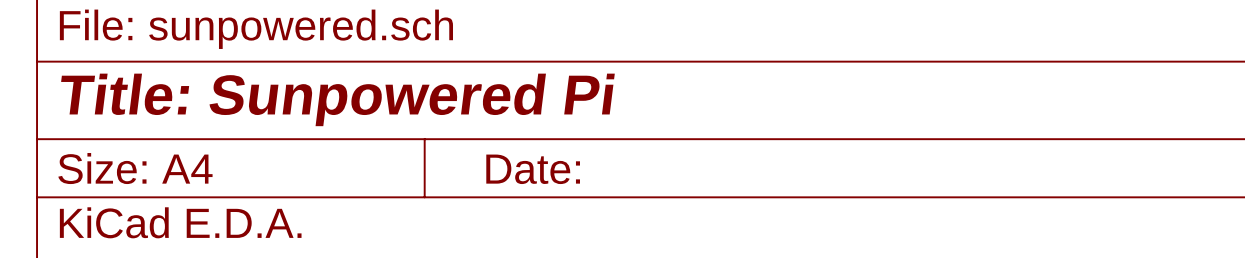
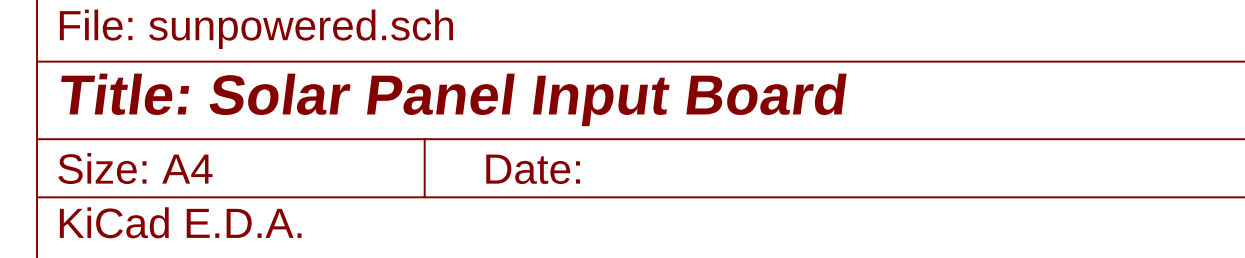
title block: Title: Sunpowered Pi (337, 99) -> Title: Solar Panel Input Board (453, 99)

